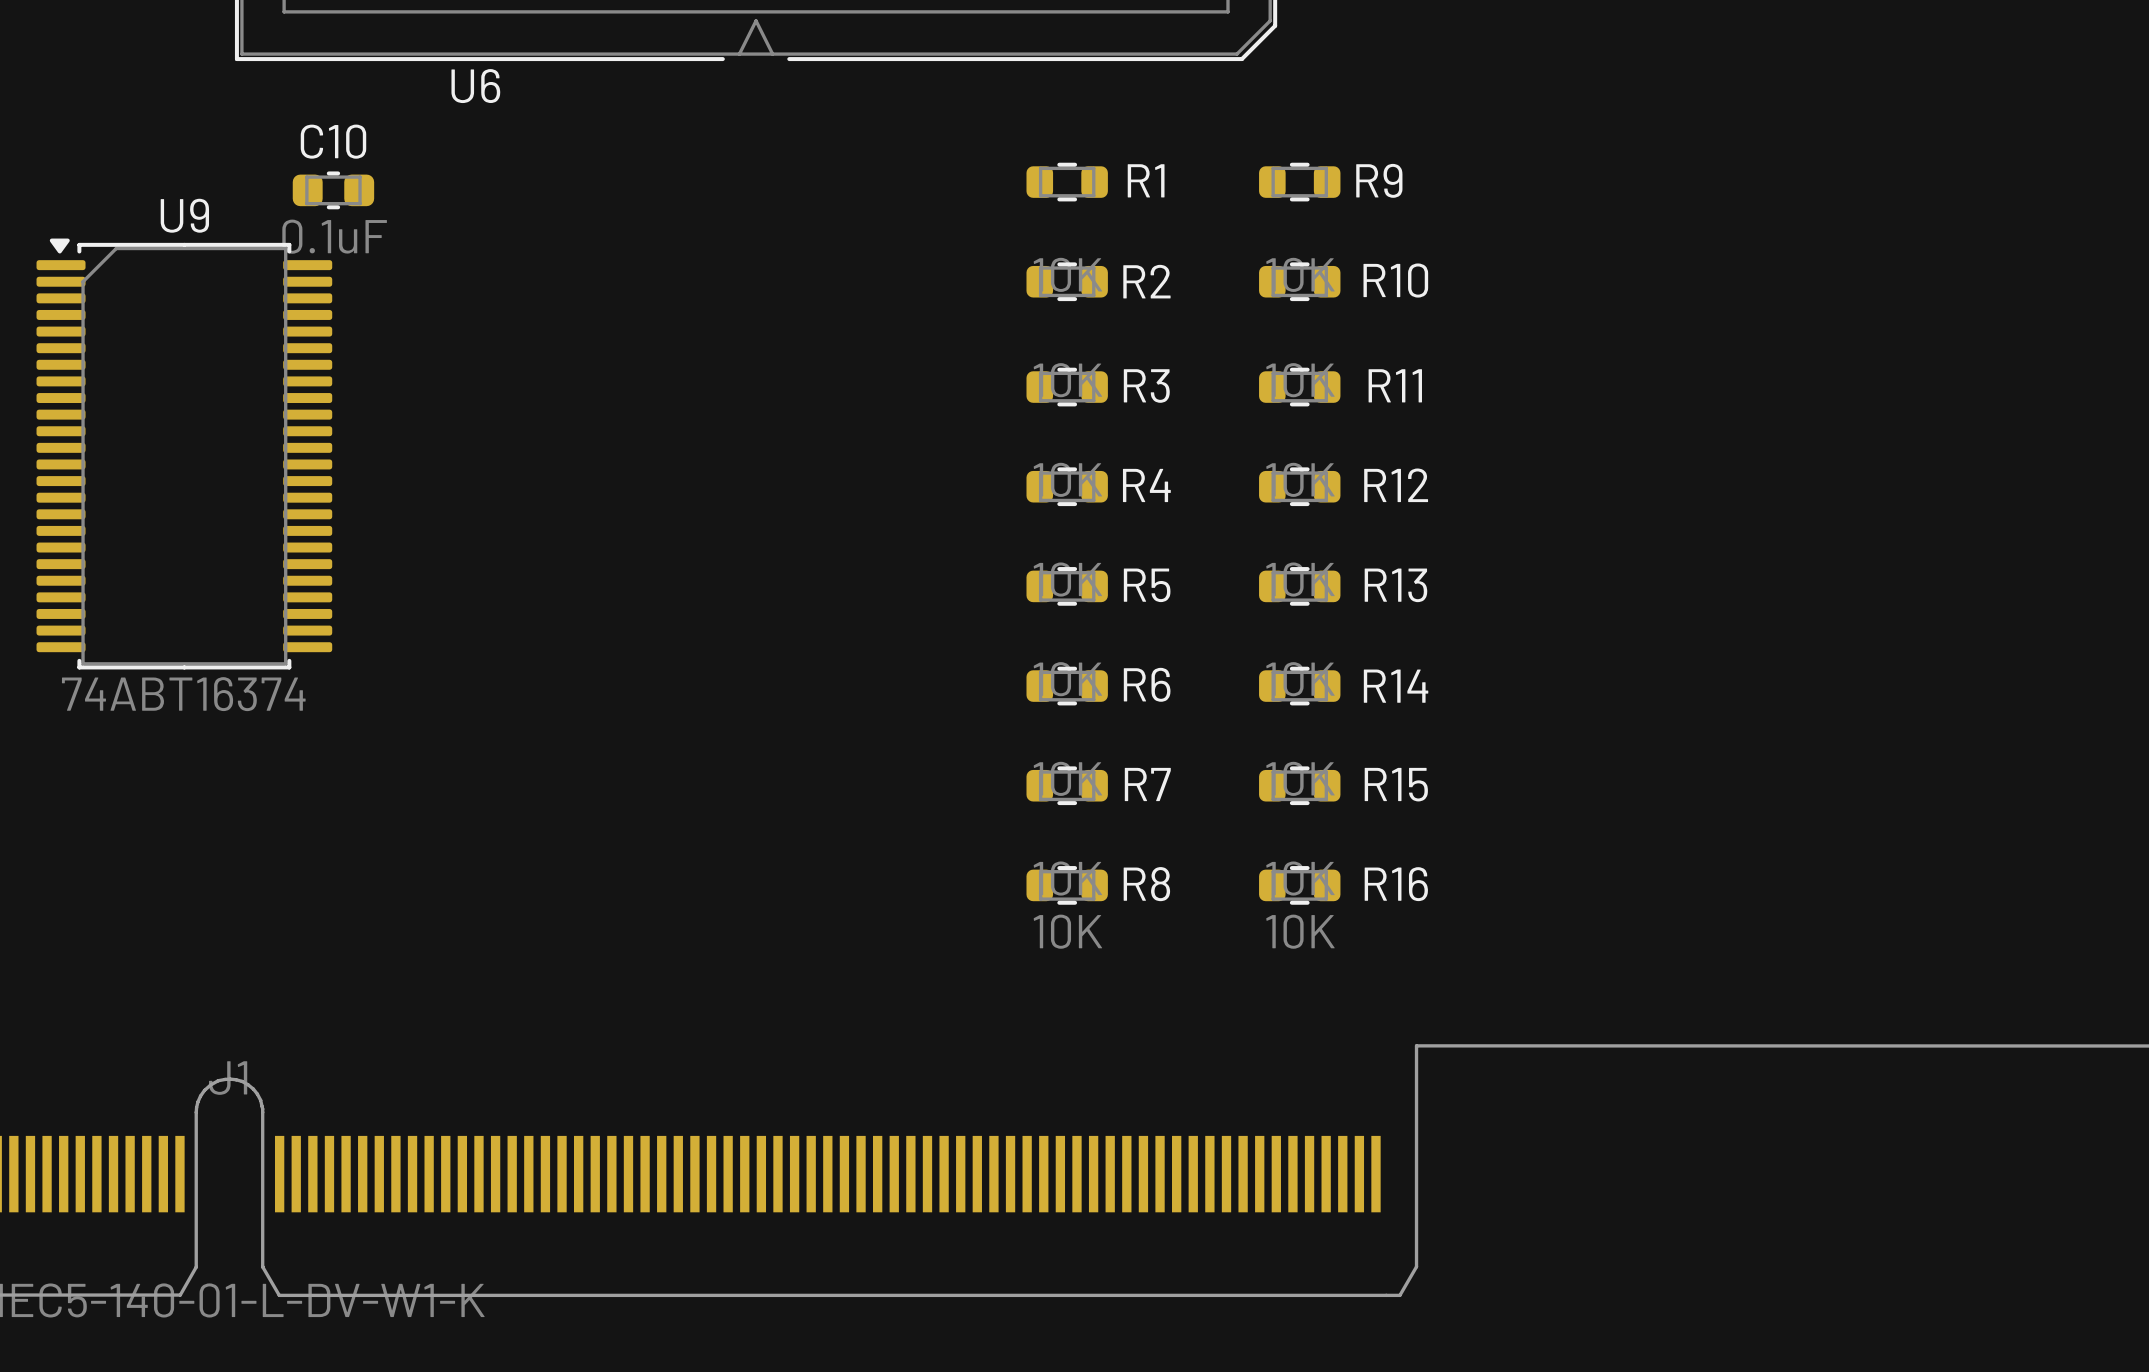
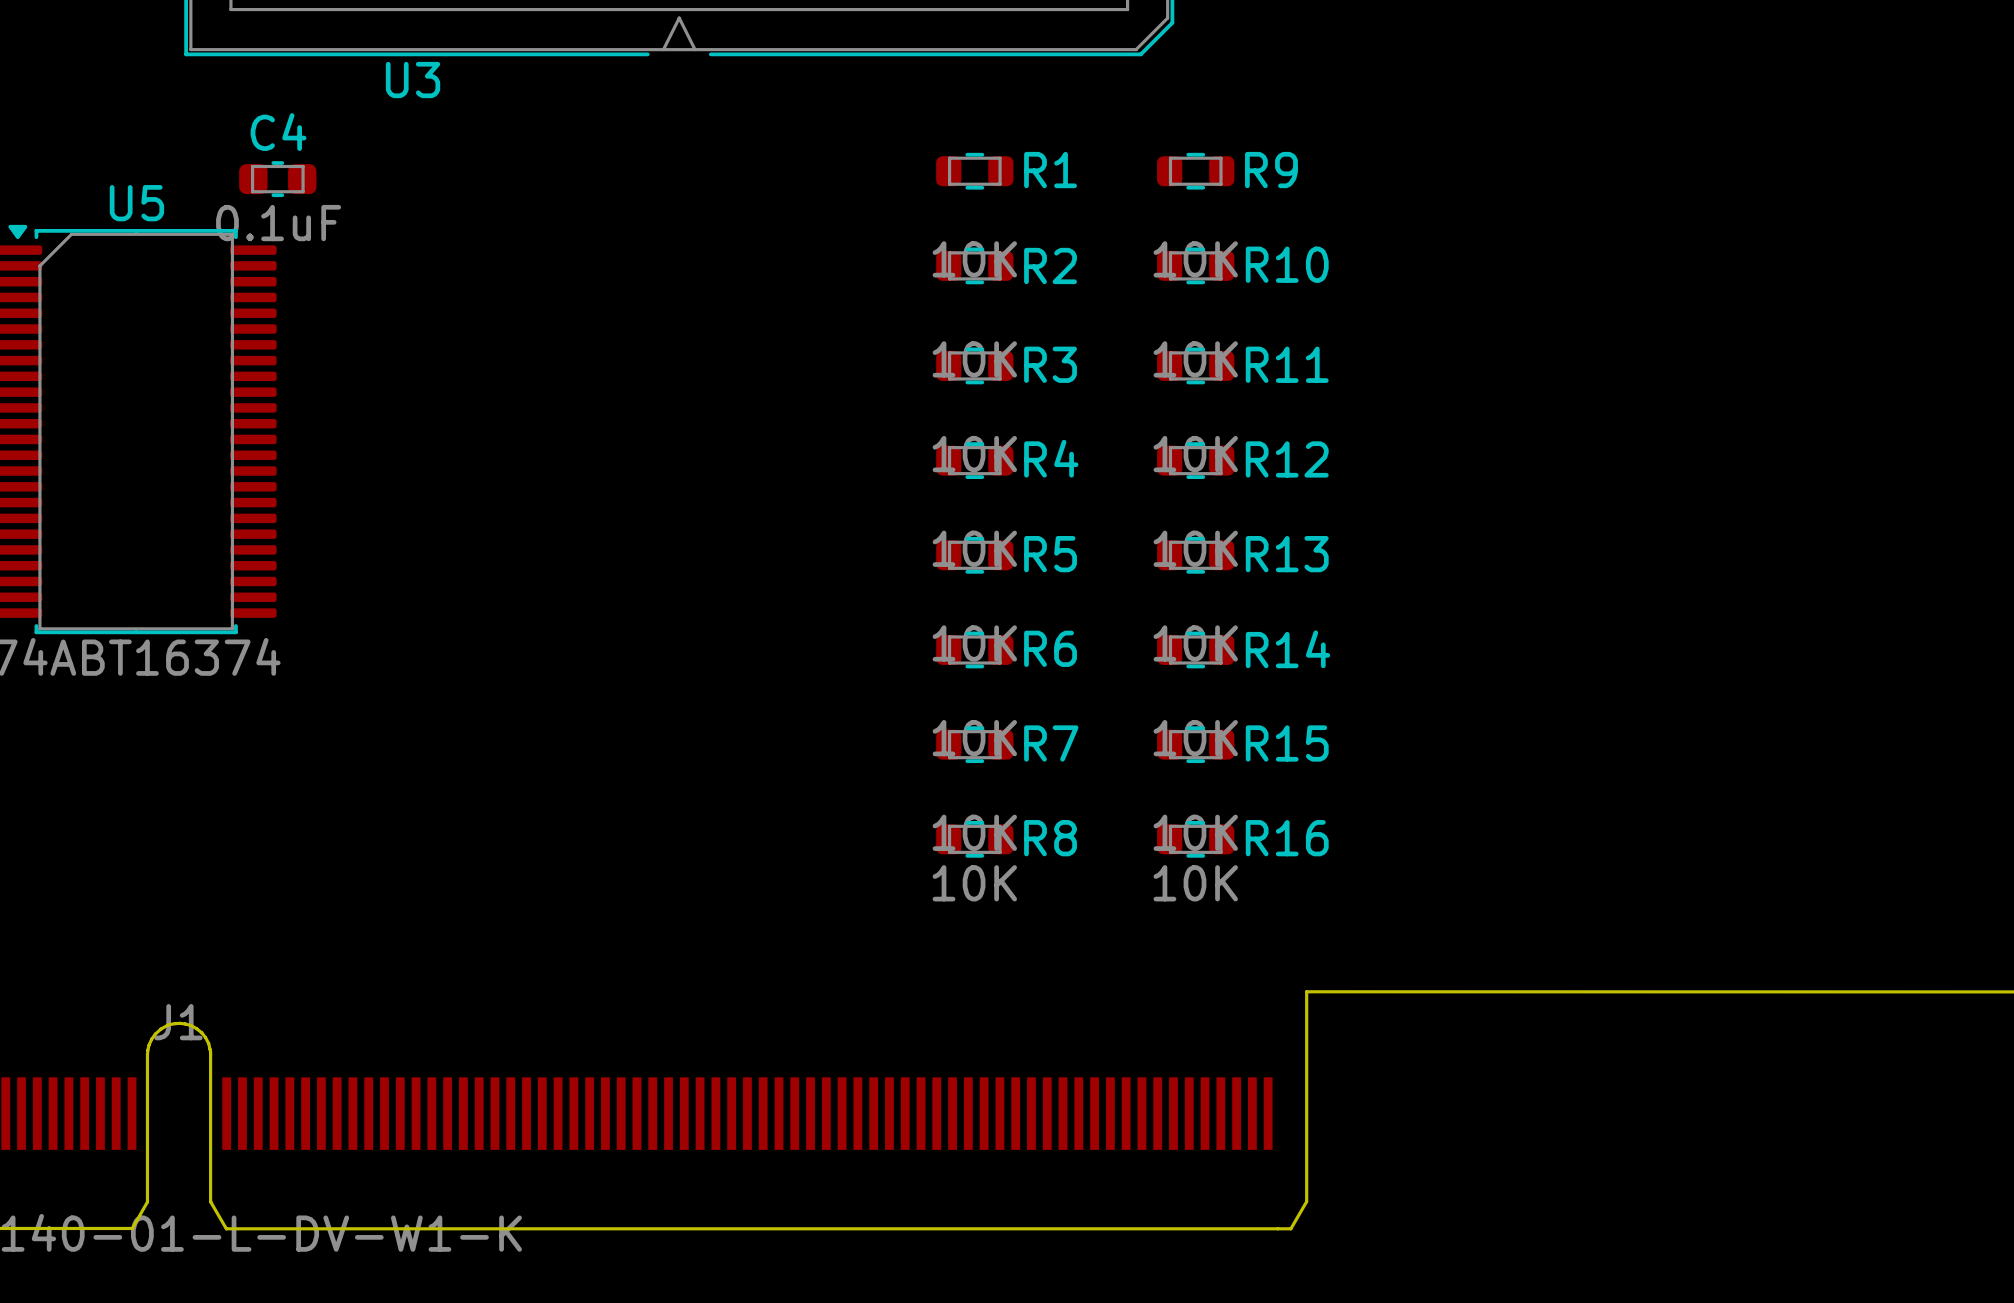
U6 name: U6 (475, 86) -> U3 (413, 80)
C10 name: C10 (333, 141) -> C4 (278, 132)
U9 name: U9 (184, 215) -> U5 (136, 203)

